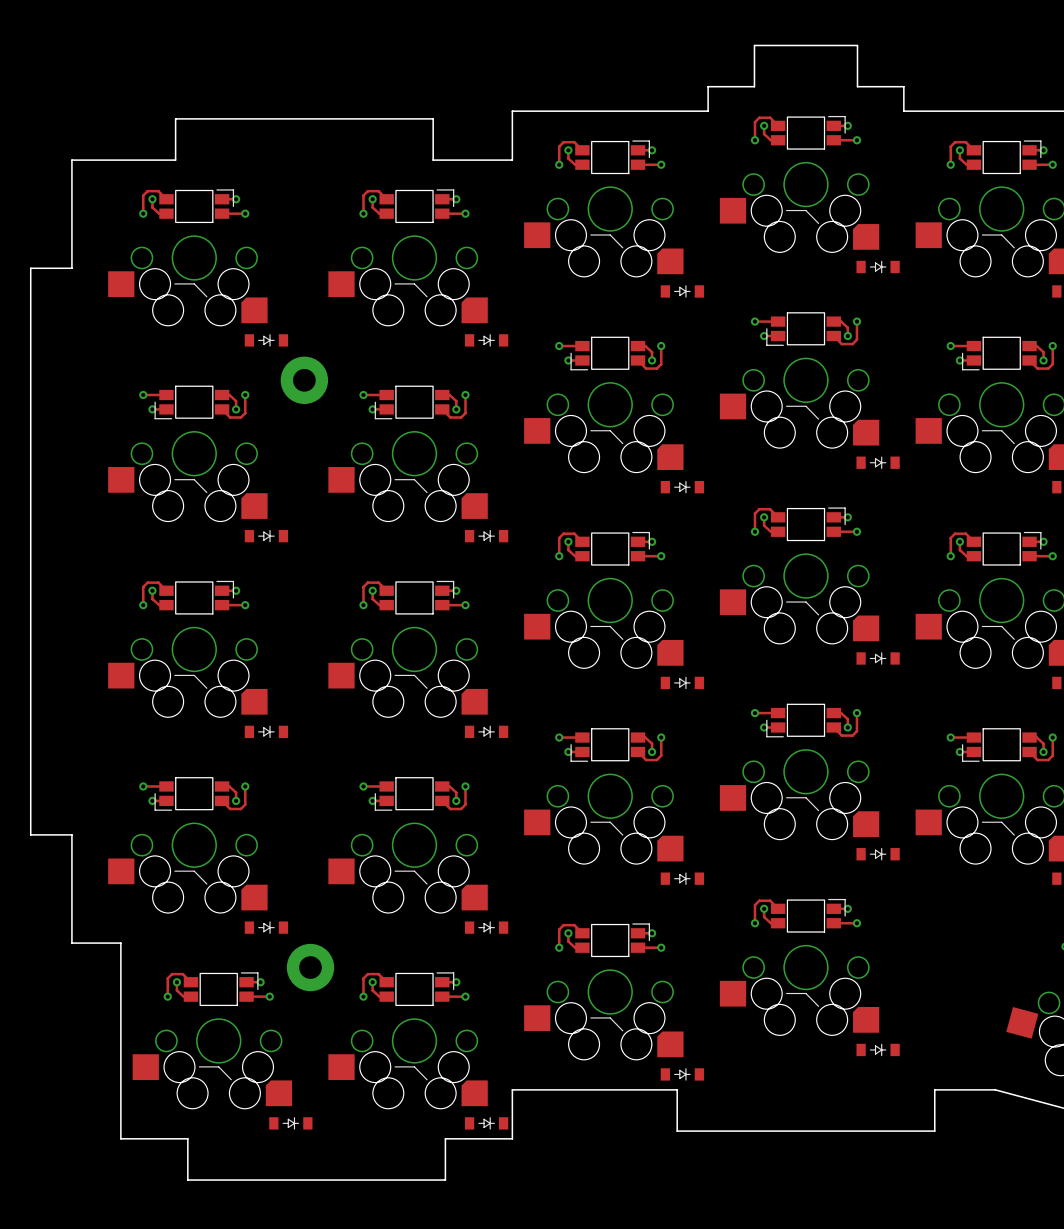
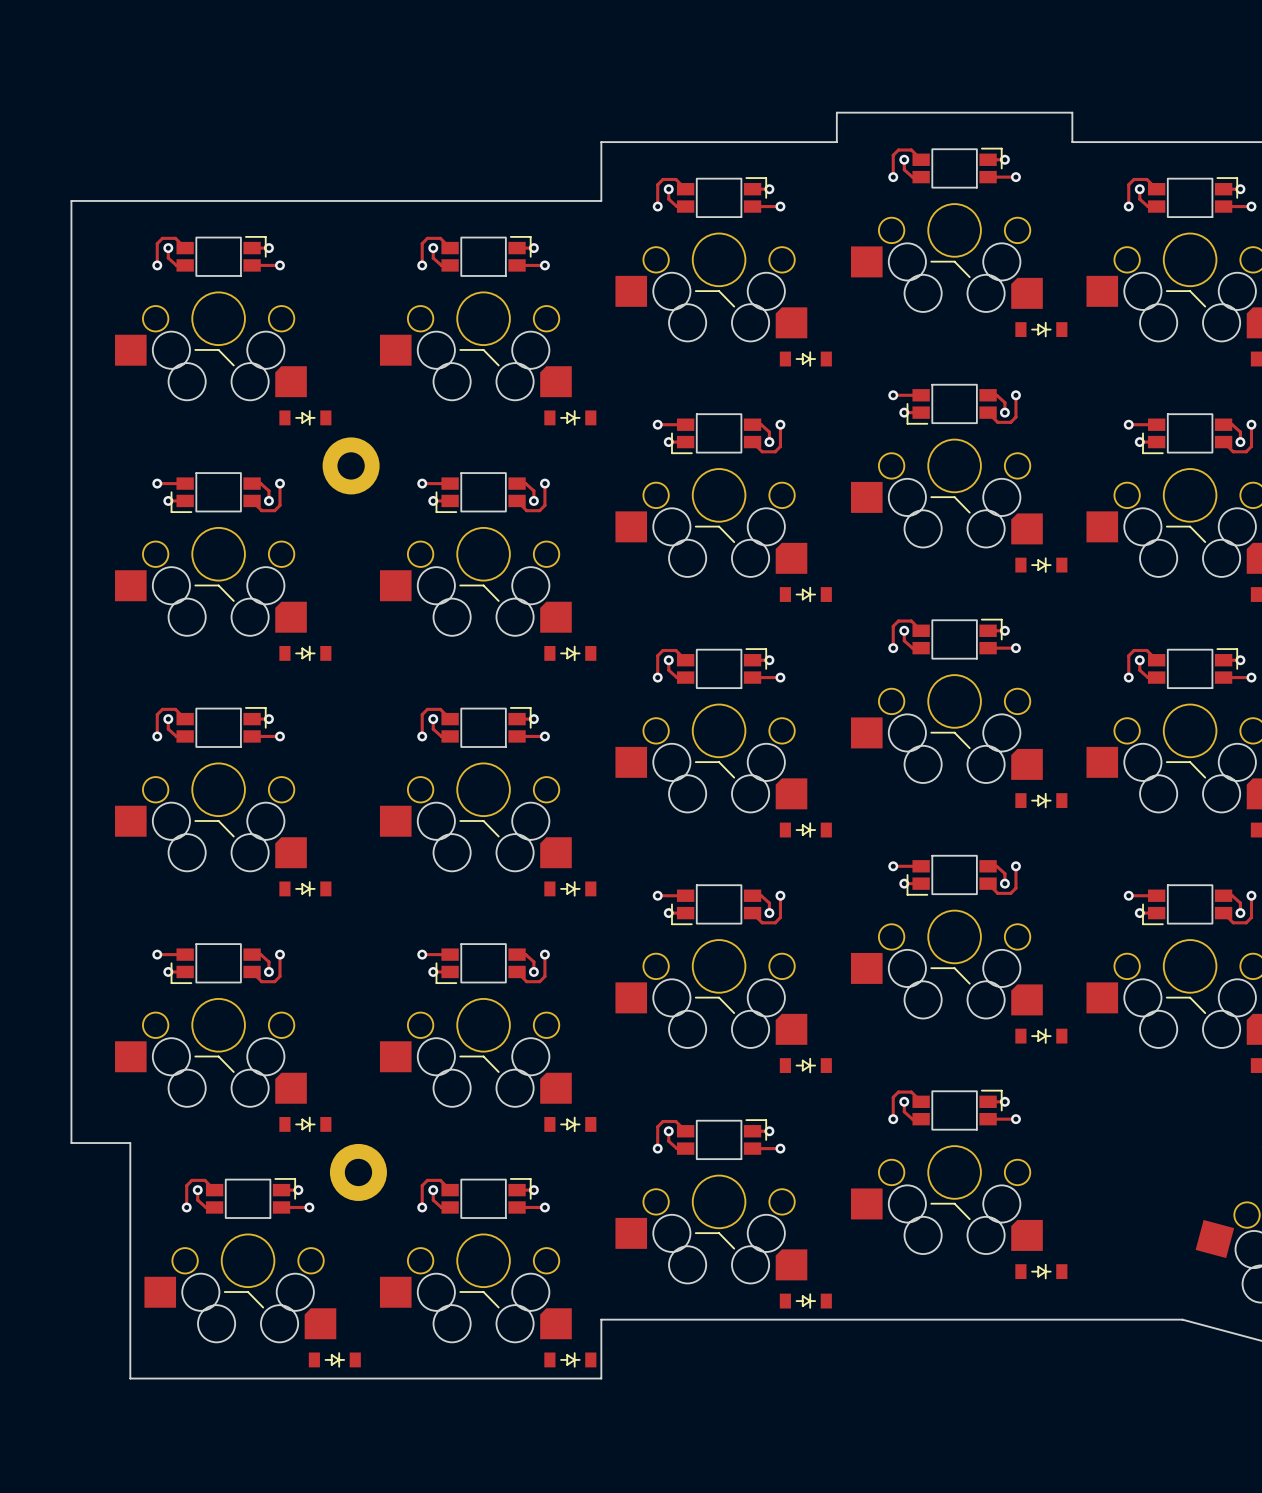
board edge: (754, 86) (754, 45) (857, 45) (857, 86) -> (892, 112) (1016, 112)
board edge: (175, 160) (175, 118) (433, 118) (433, 160) -> (196, 200) (506, 200)
board edge: (71, 268) (30, 268) (30, 834) (71, 834) -> (71, 331) (71, 1012)
board edge: (677, 1089) (677, 1131) (934, 1131) (934, 1089) -> (799, 1319) (1109, 1319)
board edge: (187, 1138) (187, 1180) (445, 1180) (445, 1138) -> (210, 1378) (520, 1378)

